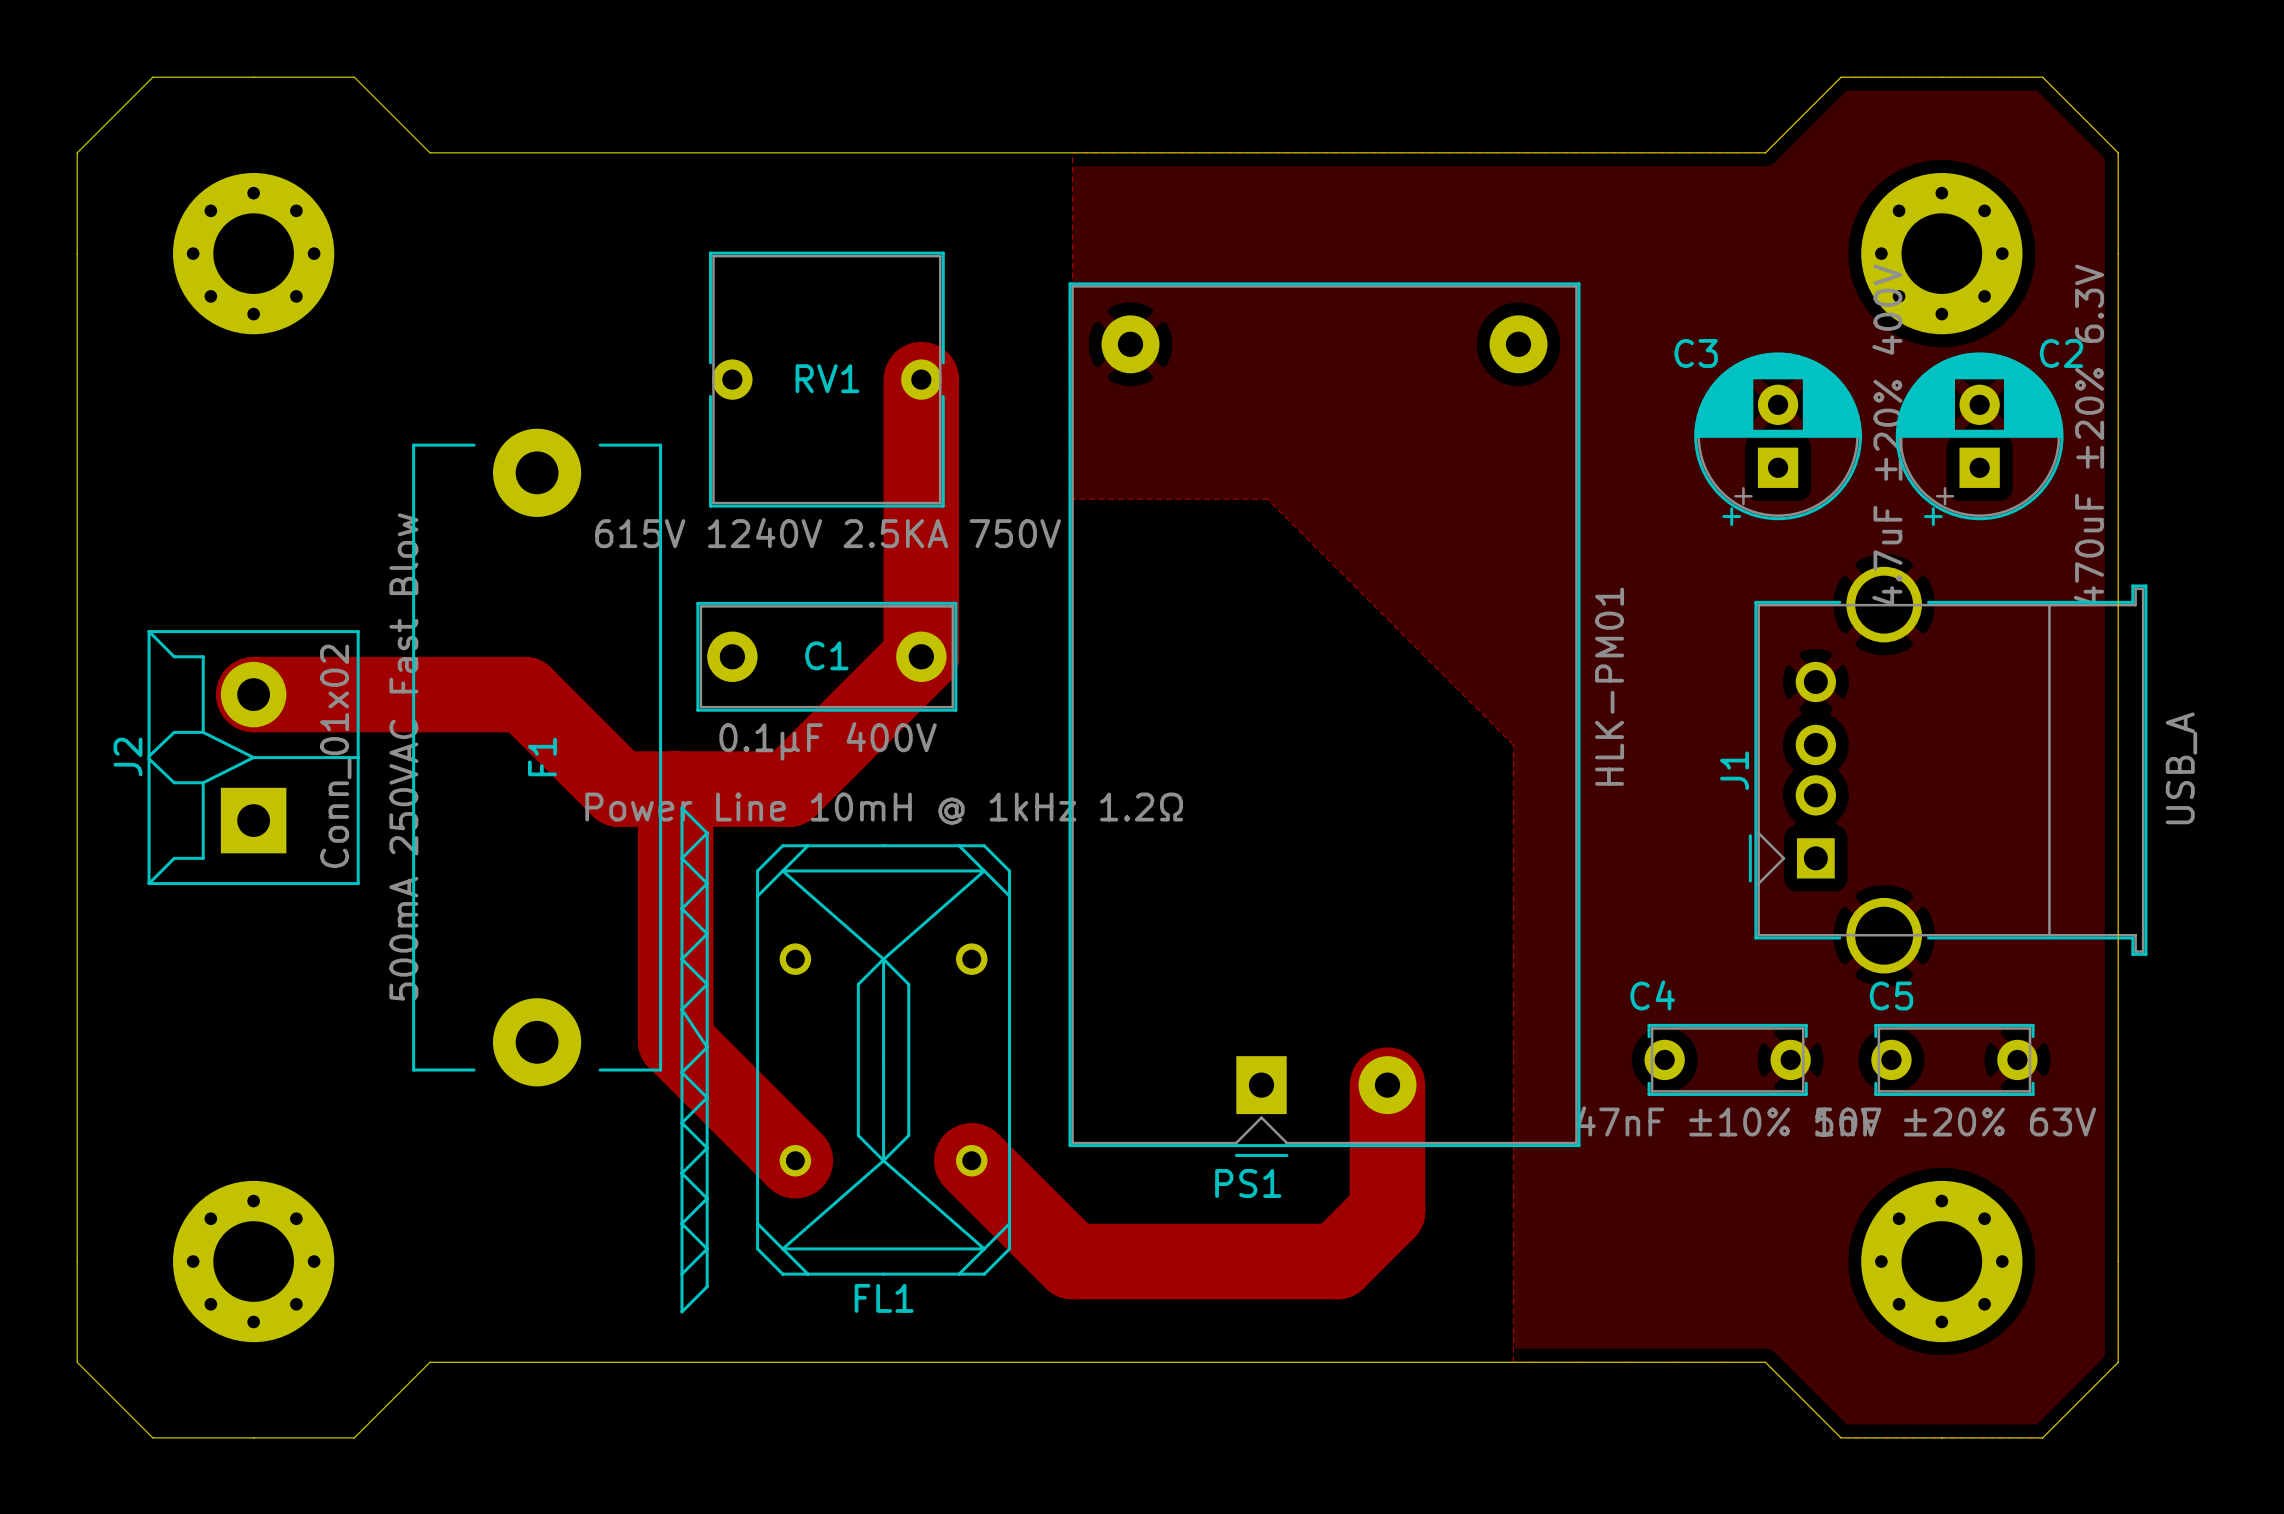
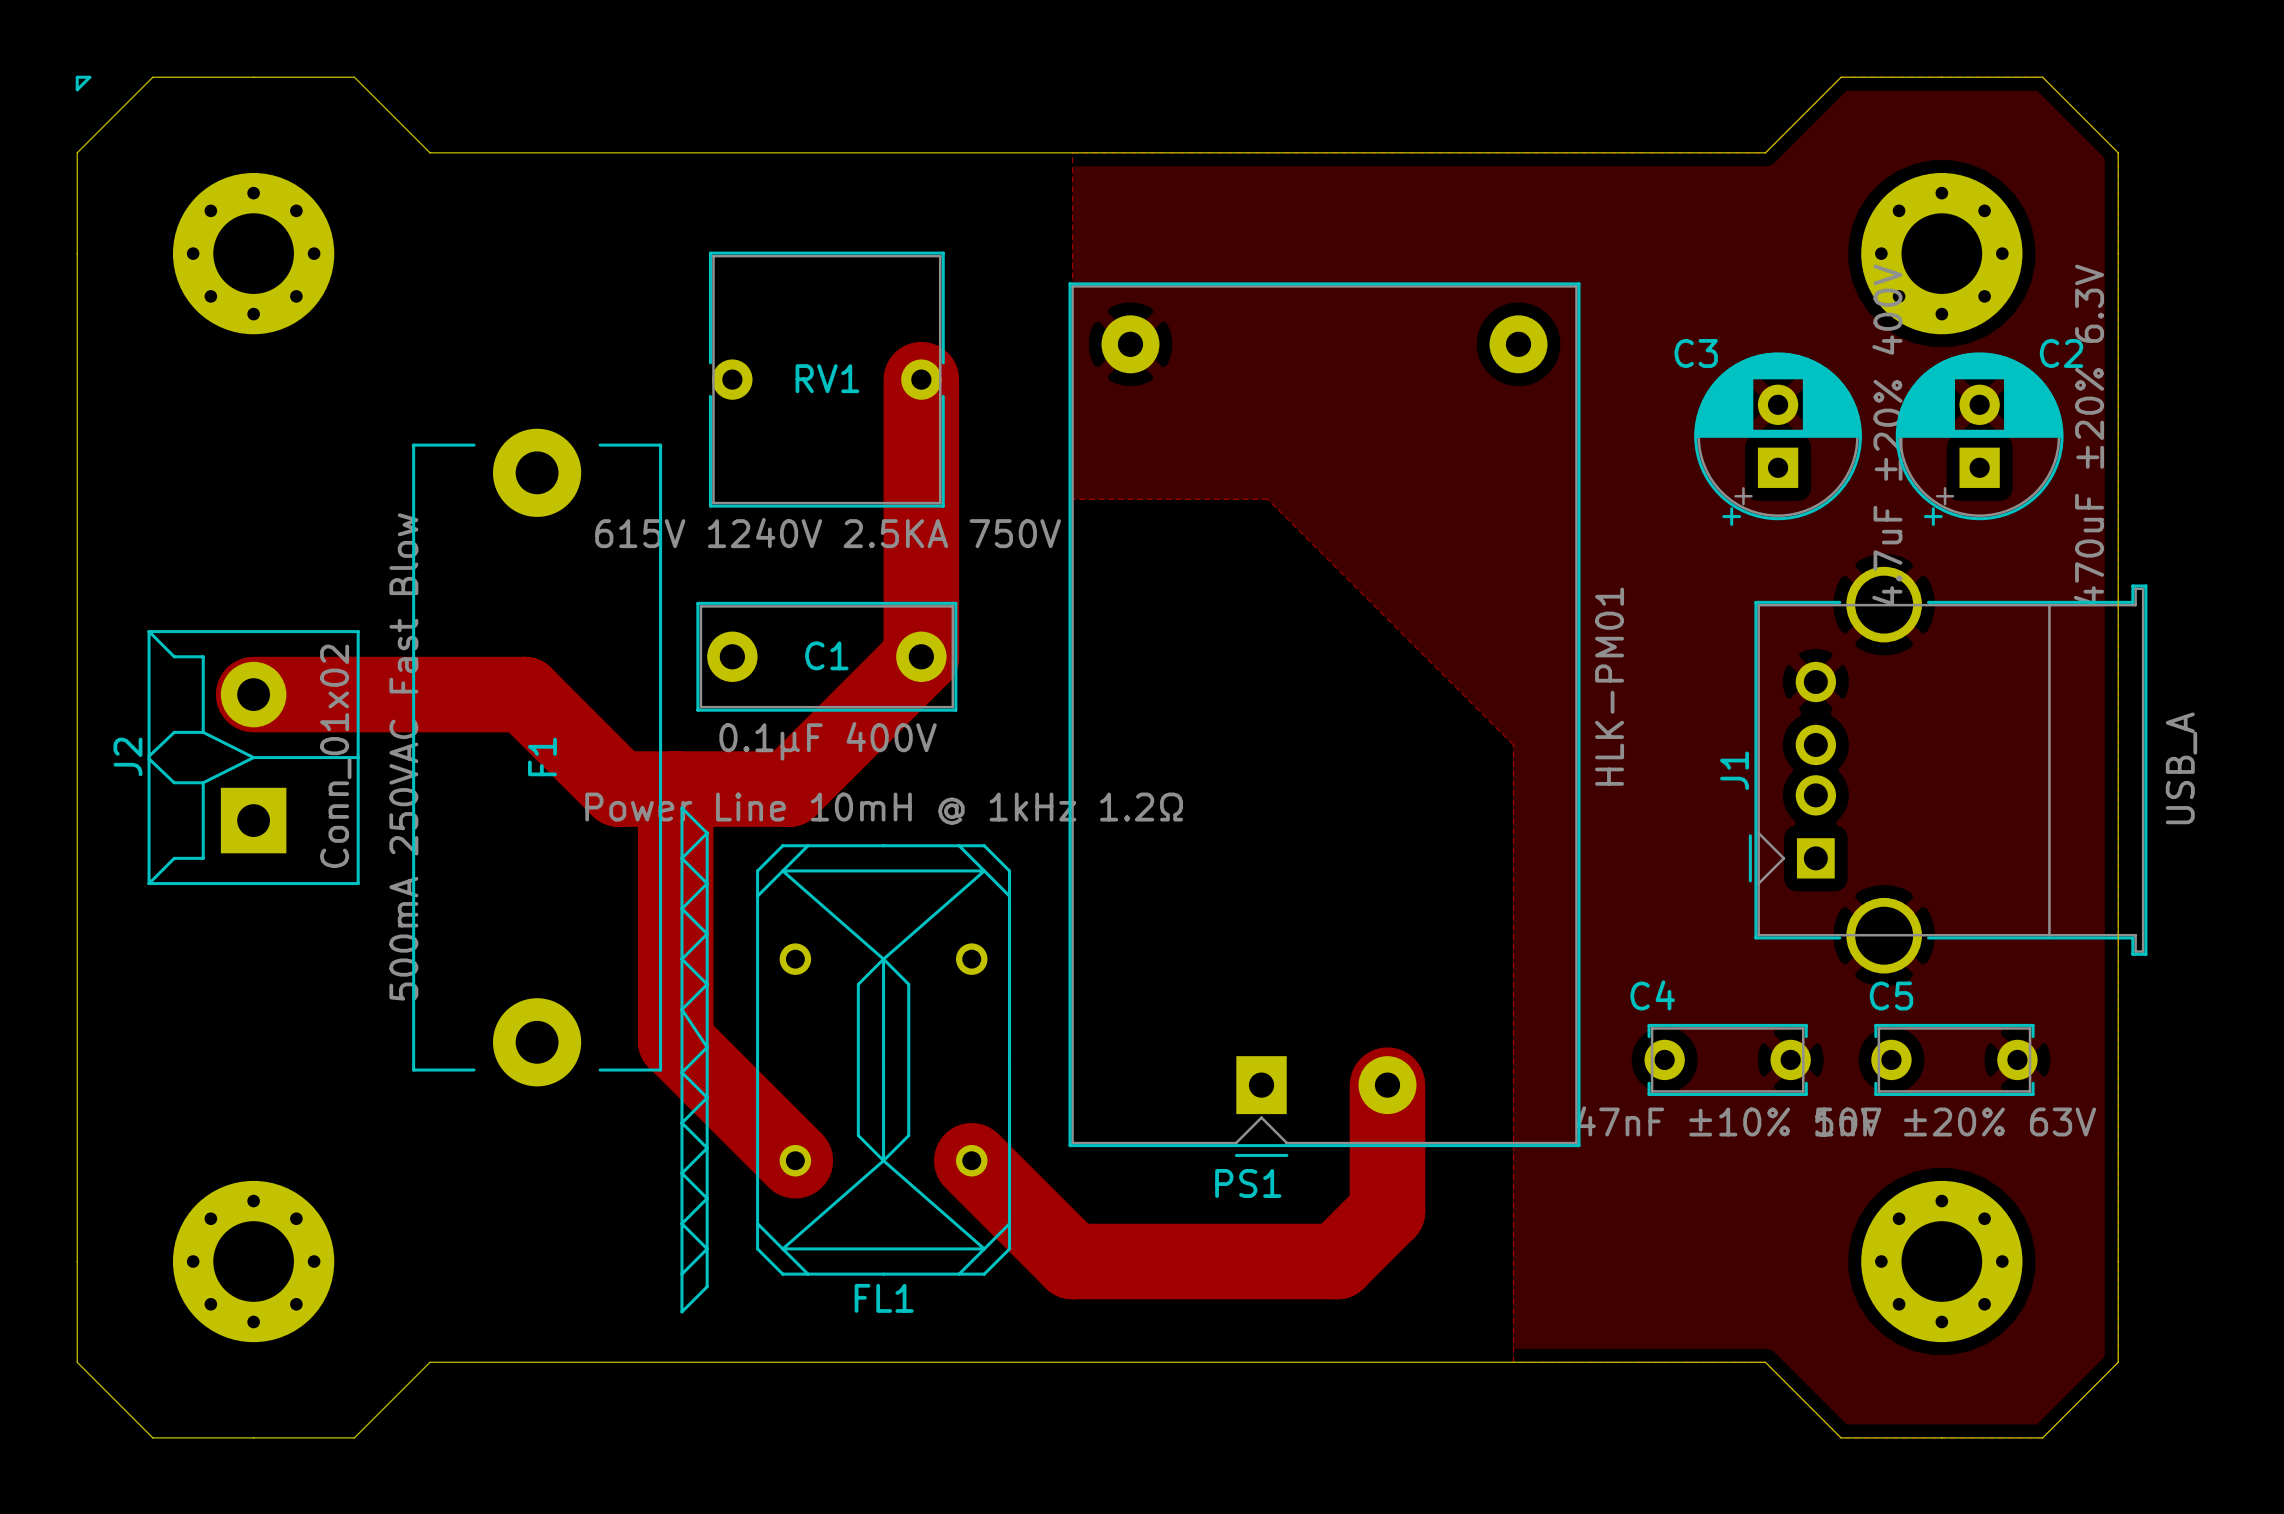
line: none -> (77, 77) (89, 77) (77, 89) (77, 77)

